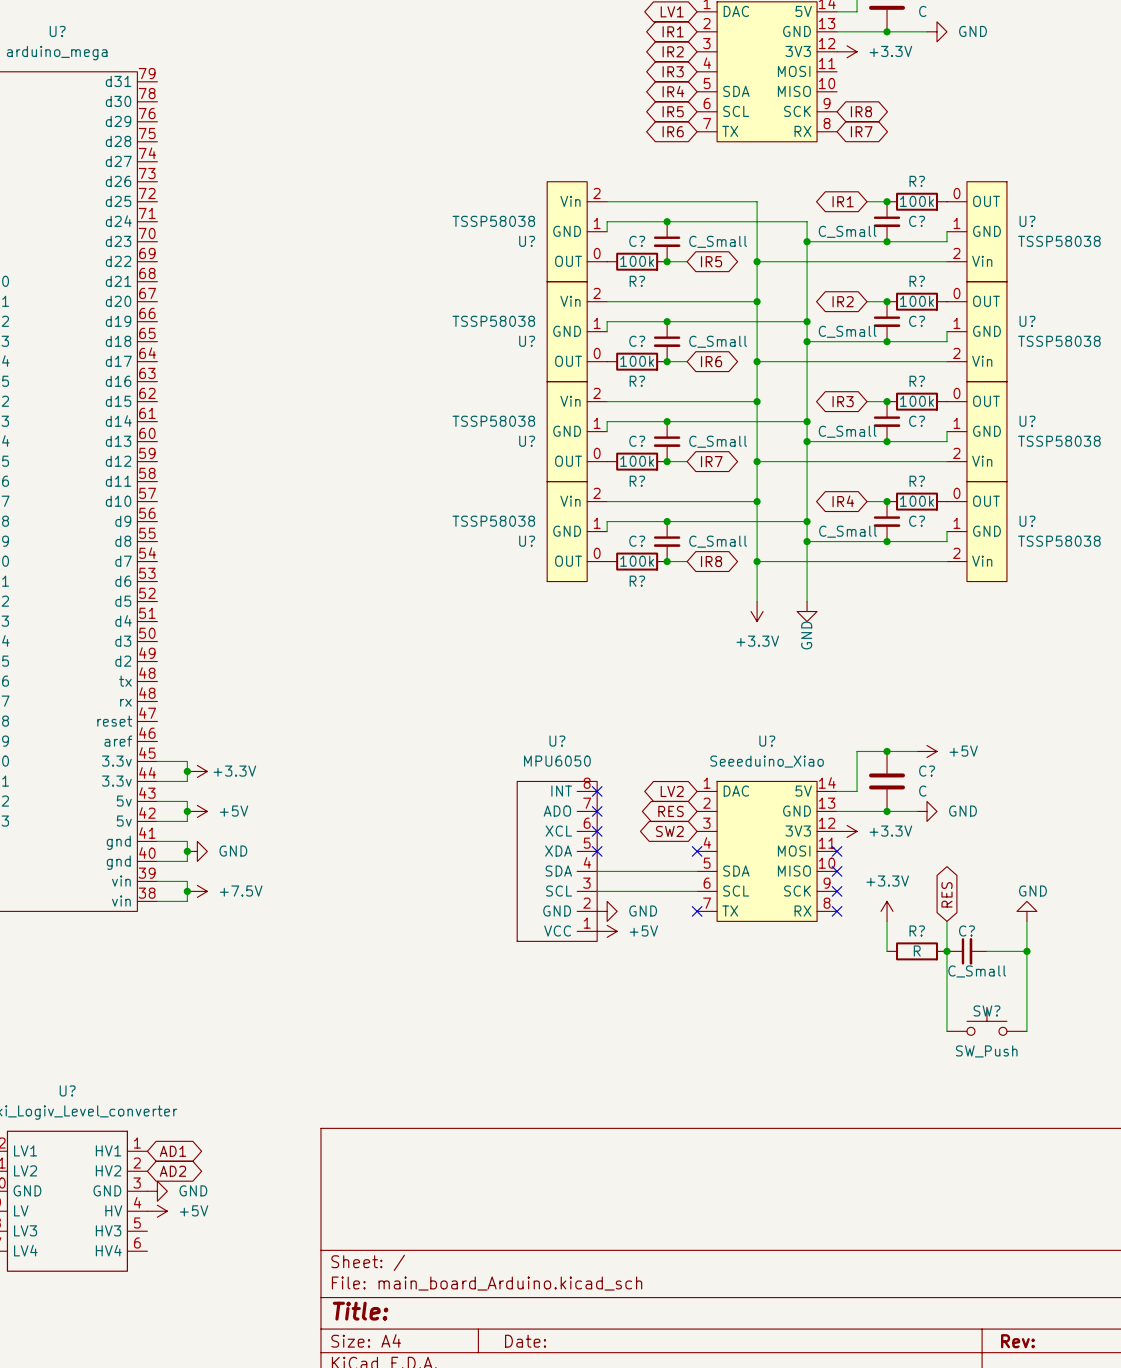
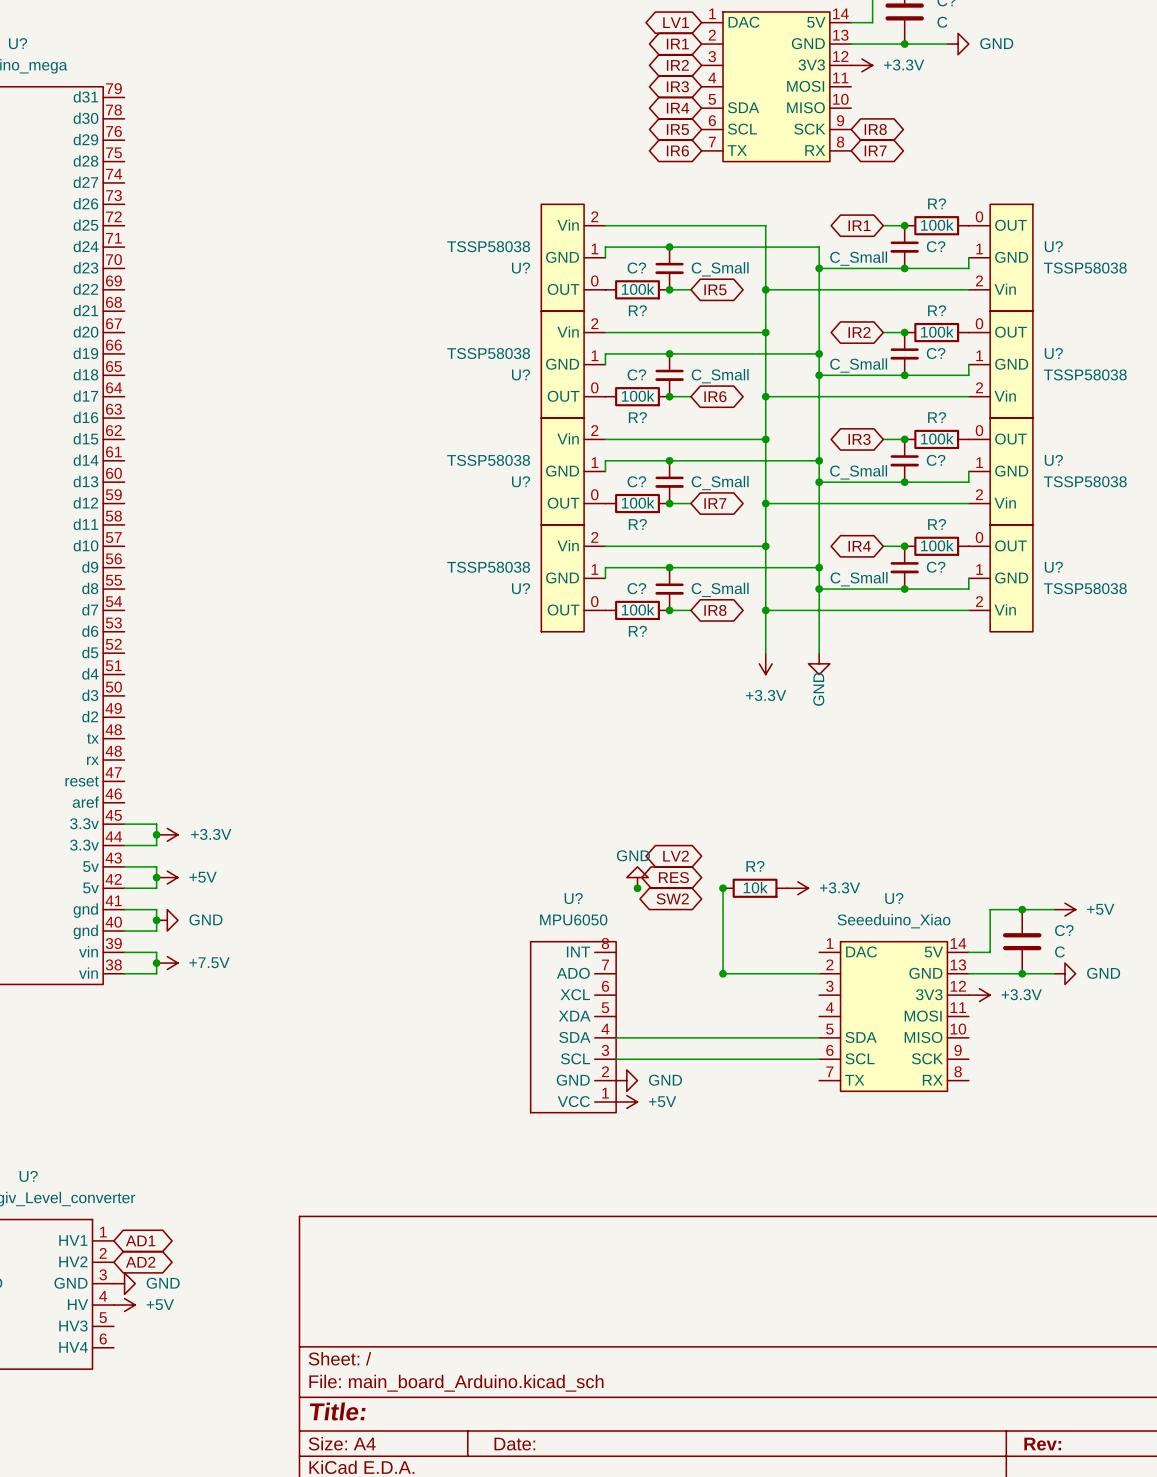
junction: (887, 751) -> none
wire: (917, 751) (857, 751) (857, 791) (837, 791) -> (1054, 909) (990, 909) (990, 952) (968, 952)
power symbol position: +5V (926, 751) -> +5V (1064, 909)
C? position: (887, 781) -> (1022, 941)
no-connect mark: (597, 791) -> none
no-connect mark: (597, 811) -> none
power symbol: none -> GND (637, 877)
wire: (837, 811) (917, 811) -> (968, 973) (1054, 973)
junction: (887, 811) -> none
power symbol: GND (926, 811) -> none
junction: none -> (637, 888)
junction: none -> (723, 888)
R?: none -> 10k (755, 888)
no-connect mark: (597, 831) -> none
power symbol position: +3.3V (847, 831) -> +3.3V (797, 888)
junction: none -> (1022, 909)
no-connect mark: (597, 851) -> none
no-connect mark: (697, 851) -> none
U? position: (767, 851) -> (893, 1016)
no-connect mark: (837, 851) -> none
U? position: (557, 861) -> (573, 1027)
wire: (597, 871) (697, 871) -> none
no-connect mark: (837, 871) -> none
wire: (597, 891) (697, 891) -> none
no-connect mark: (837, 891) -> none
power symbol text position: GND (1032, 891) -> GND (1103, 973)
global label: RES (946, 894) -> none
junction: none -> (723, 973)
junction: none -> (1022, 973)
power symbol: GND (607, 911) -> none
no-connect mark: (697, 911) -> none
no-connect mark: (837, 911) -> none
power symbol: +3.3V (887, 911) -> none
power symbol rotation: 0° (1026, 911) -> 90° clockwise (1064, 973)
power symbol position: GND (1026, 911) -> GND (1064, 973)
wire: (946, 921) (946, 1031) -> none
power symbol: none -> +3.3V (979, 995)
wire: (1026, 921) (1026, 1031) -> none
power symbol position: +5V (607, 931) -> +5V (626, 1101)
R?: R (917, 951) -> none
junction: (946, 951) -> none
C?: C_Small (966, 951) -> none
wire: (986, 951) (1026, 951) -> none
junction: (1026, 951) -> none
wire: none -> (616, 1037) (819, 1037)
wire: none -> (616, 1059) (819, 1059)
power symbol: none -> GND (626, 1080)
SW?: SW_Push (986, 1021) -> none

